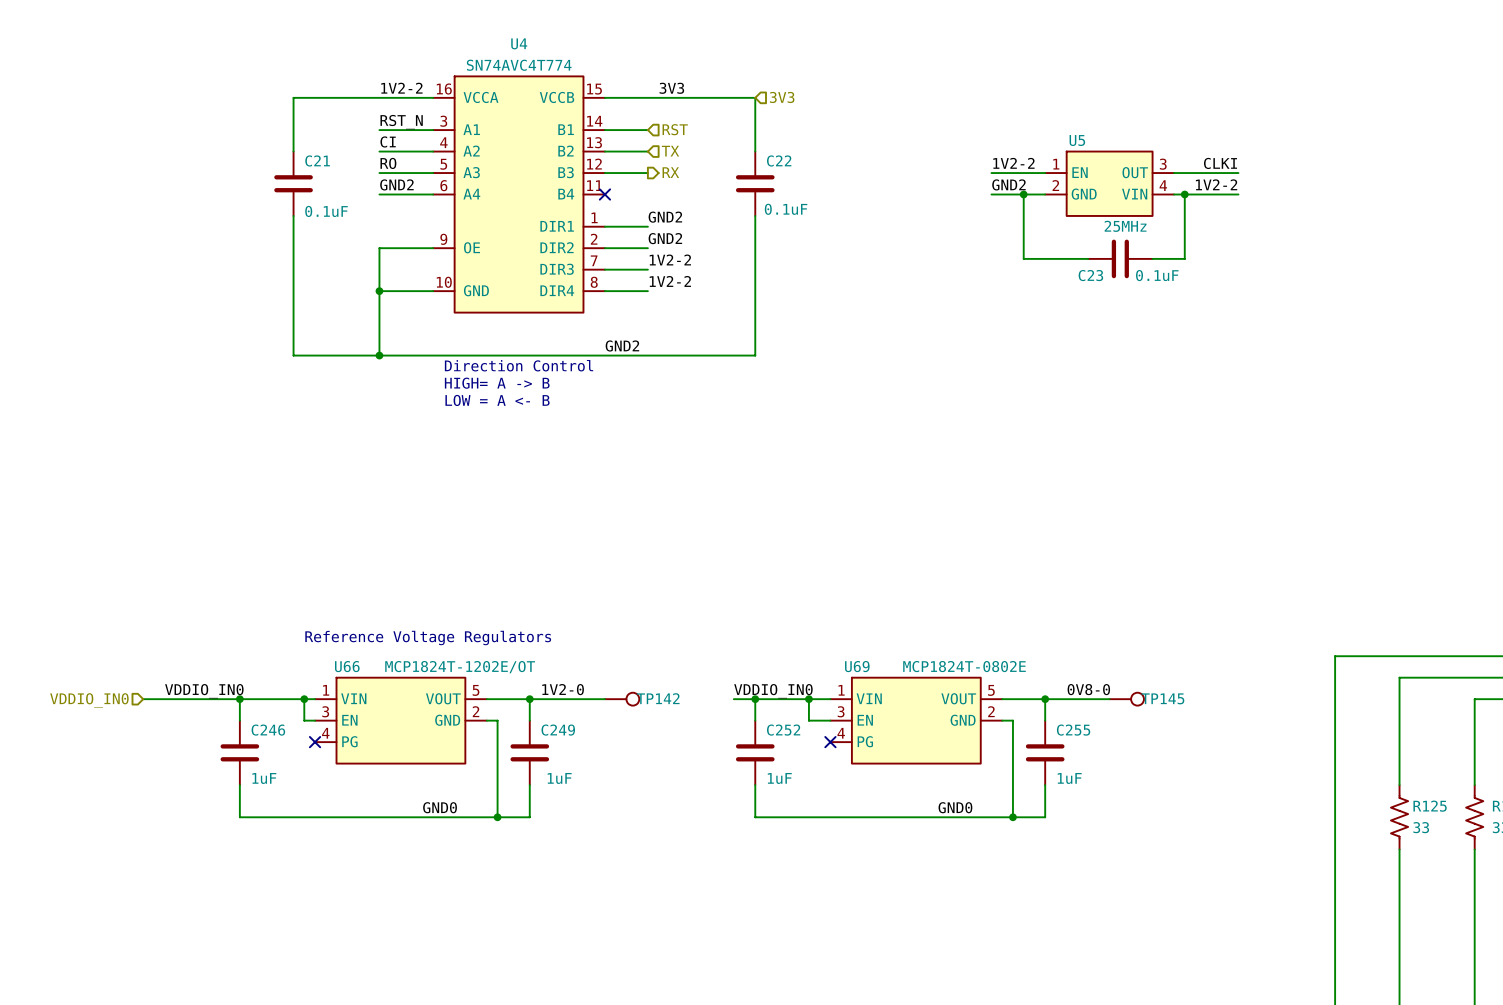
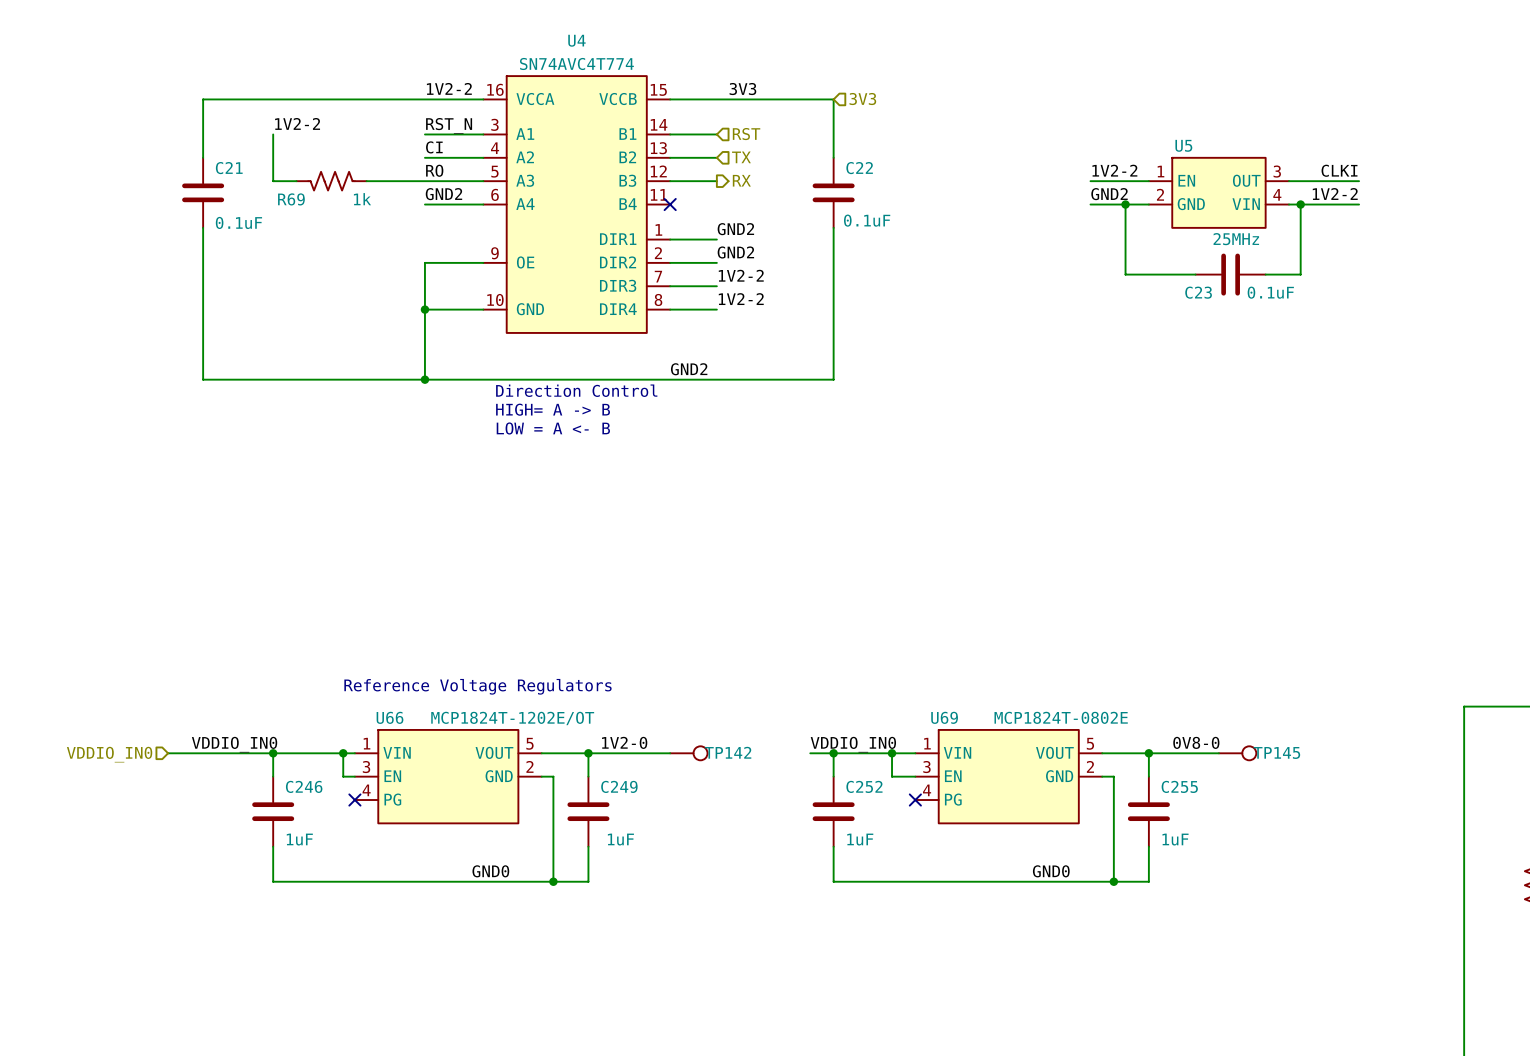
wire: (293, 97) (293, 151) -> (331, 99) (203, 99) (203, 157)
label: none -> 1V2-2 (297, 123)
wire: none -> (273, 134) (273, 181) (296, 181)
R69: none -> 1k (331, 181)
wire: none -> (366, 181) (424, 181)
C21 position: (293, 183) -> (203, 192)
wire: (293, 215) (293, 355) -> (203, 227) (203, 379) (331, 379)

